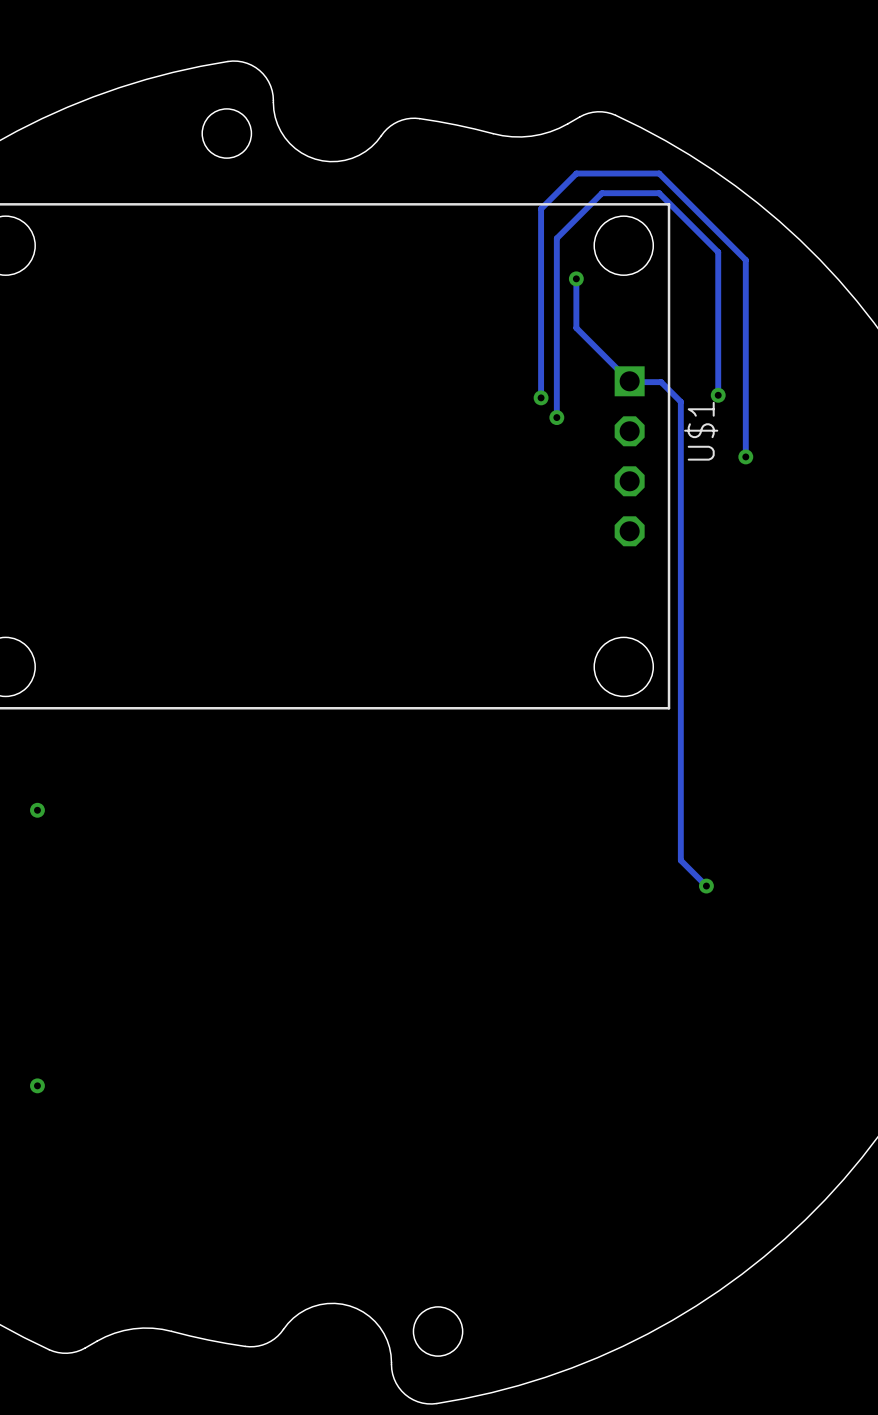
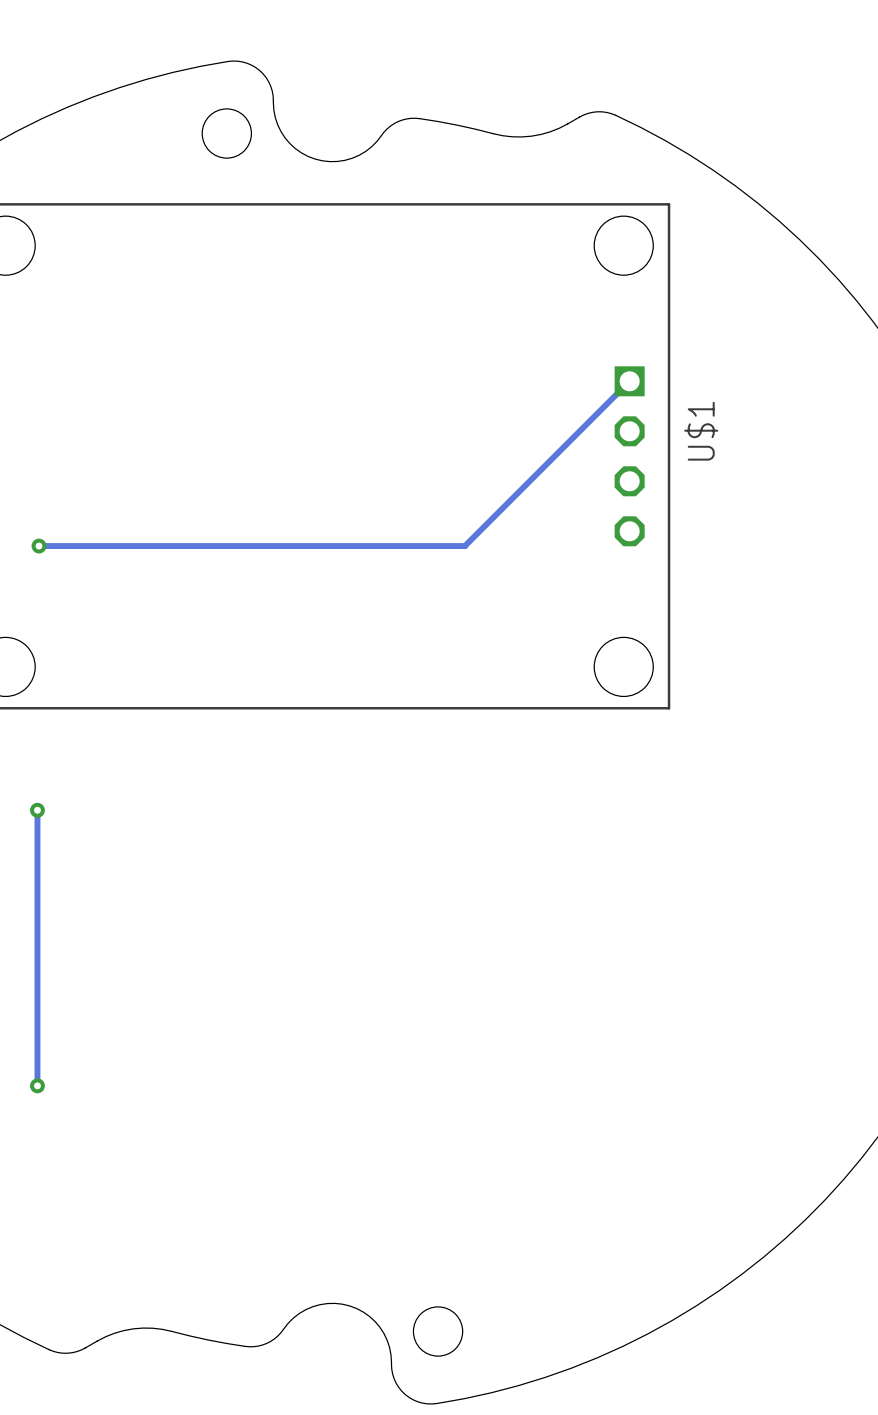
track: (576, 278) (576, 328) (630, 382) (661, 382) (680, 401) (680, 860) (706, 886) -> none
via: (576, 278) -> none
track: none -> (629, 381) (464, 546) (39, 546)
track: (718, 395) (718, 252) (659, 193) (602, 193) (556, 238) (556, 417) -> none
via: (718, 395) -> none
track: (541, 397) (541, 208) (576, 173) (659, 173) (745, 260) (745, 456) -> none
via: (541, 397) -> none
via: (556, 417) -> none
via: (745, 456) -> none
via: none -> (39, 546)
track: none -> (37, 810) (37, 1085)
via: (706, 886) -> none

